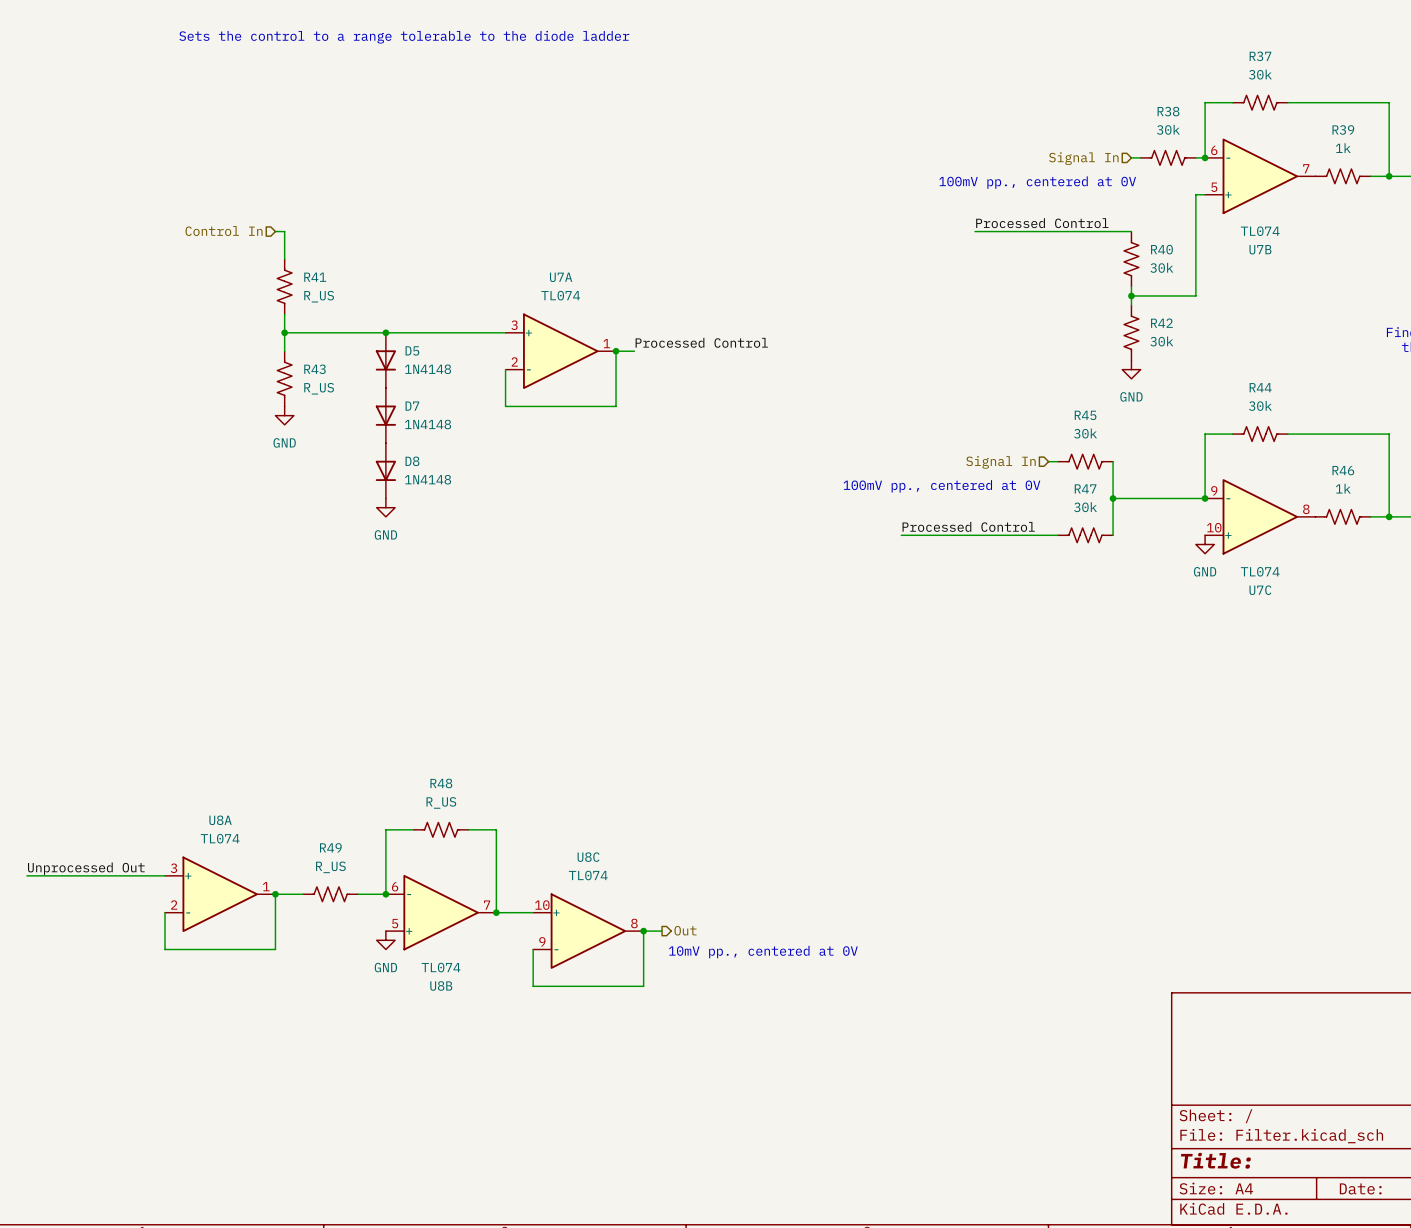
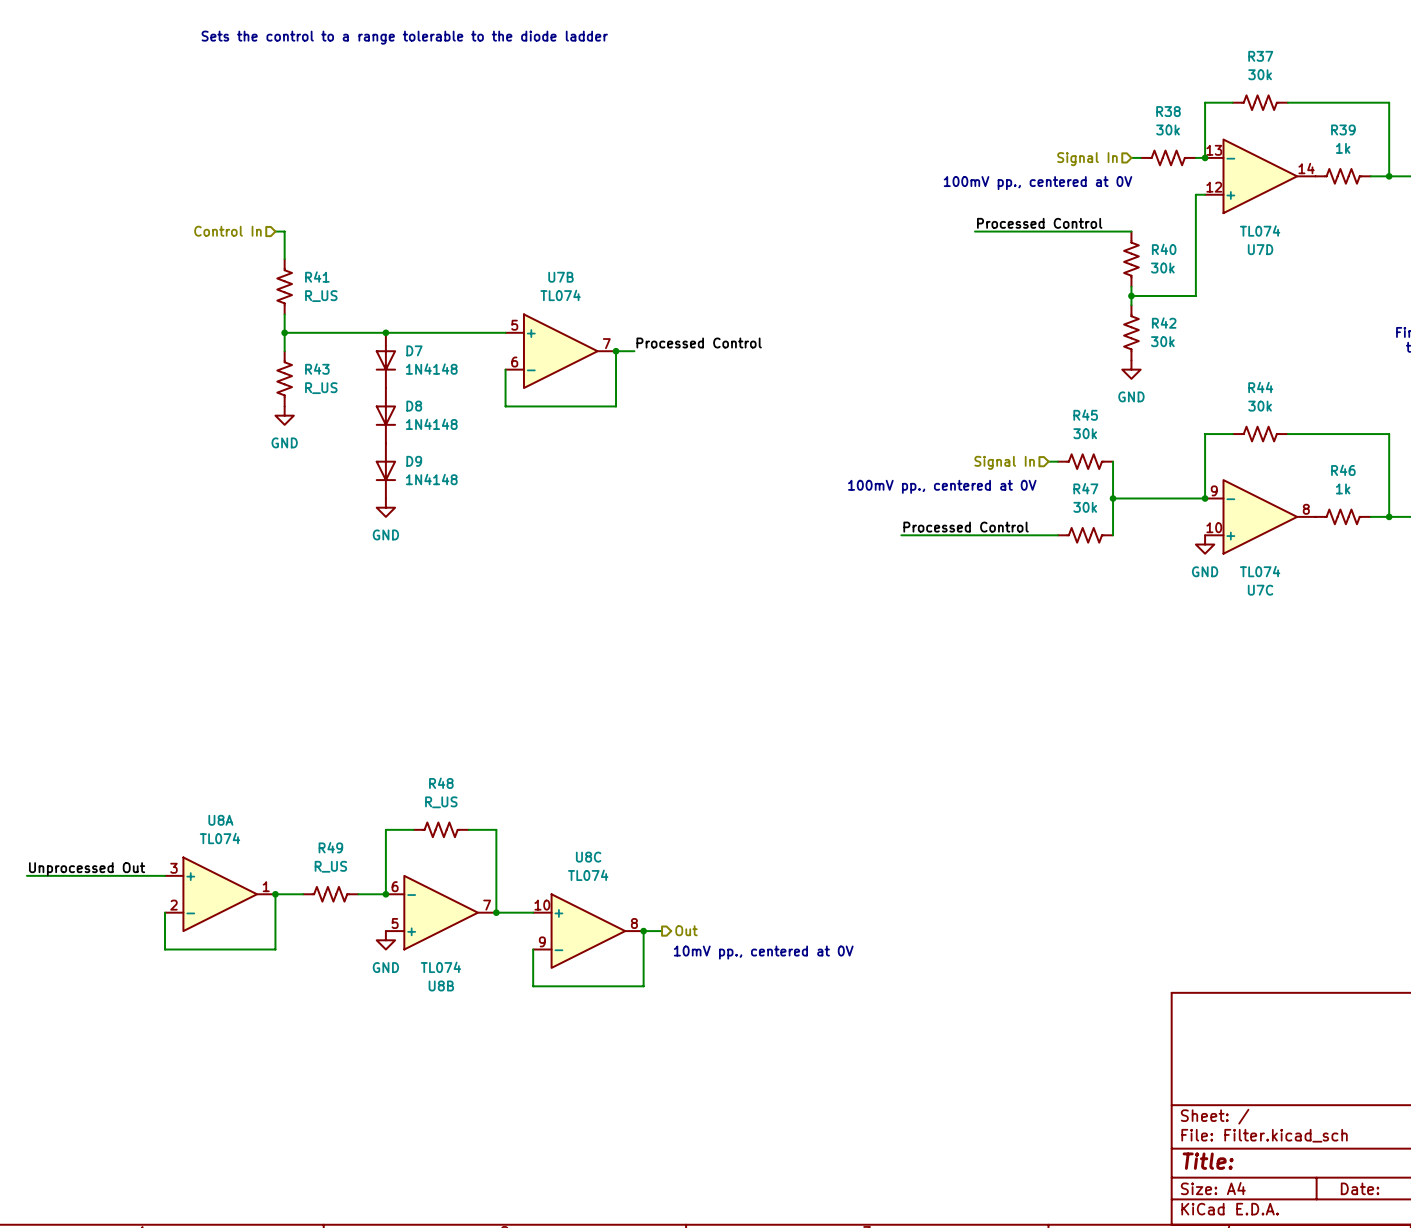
U7B flip: as is (1260, 176) -> up-down (560, 351)
U7B position: (1260, 176) -> (560, 351)
U7D: none -> TL074 (1260, 176)
D5 name: D5 (412, 350) -> D7 (414, 350)
U7A: TL074 (560, 351) -> none
D7 name: D7 (412, 406) -> D8 (414, 406)
D8 name: D8 (412, 461) -> D9 (414, 461)

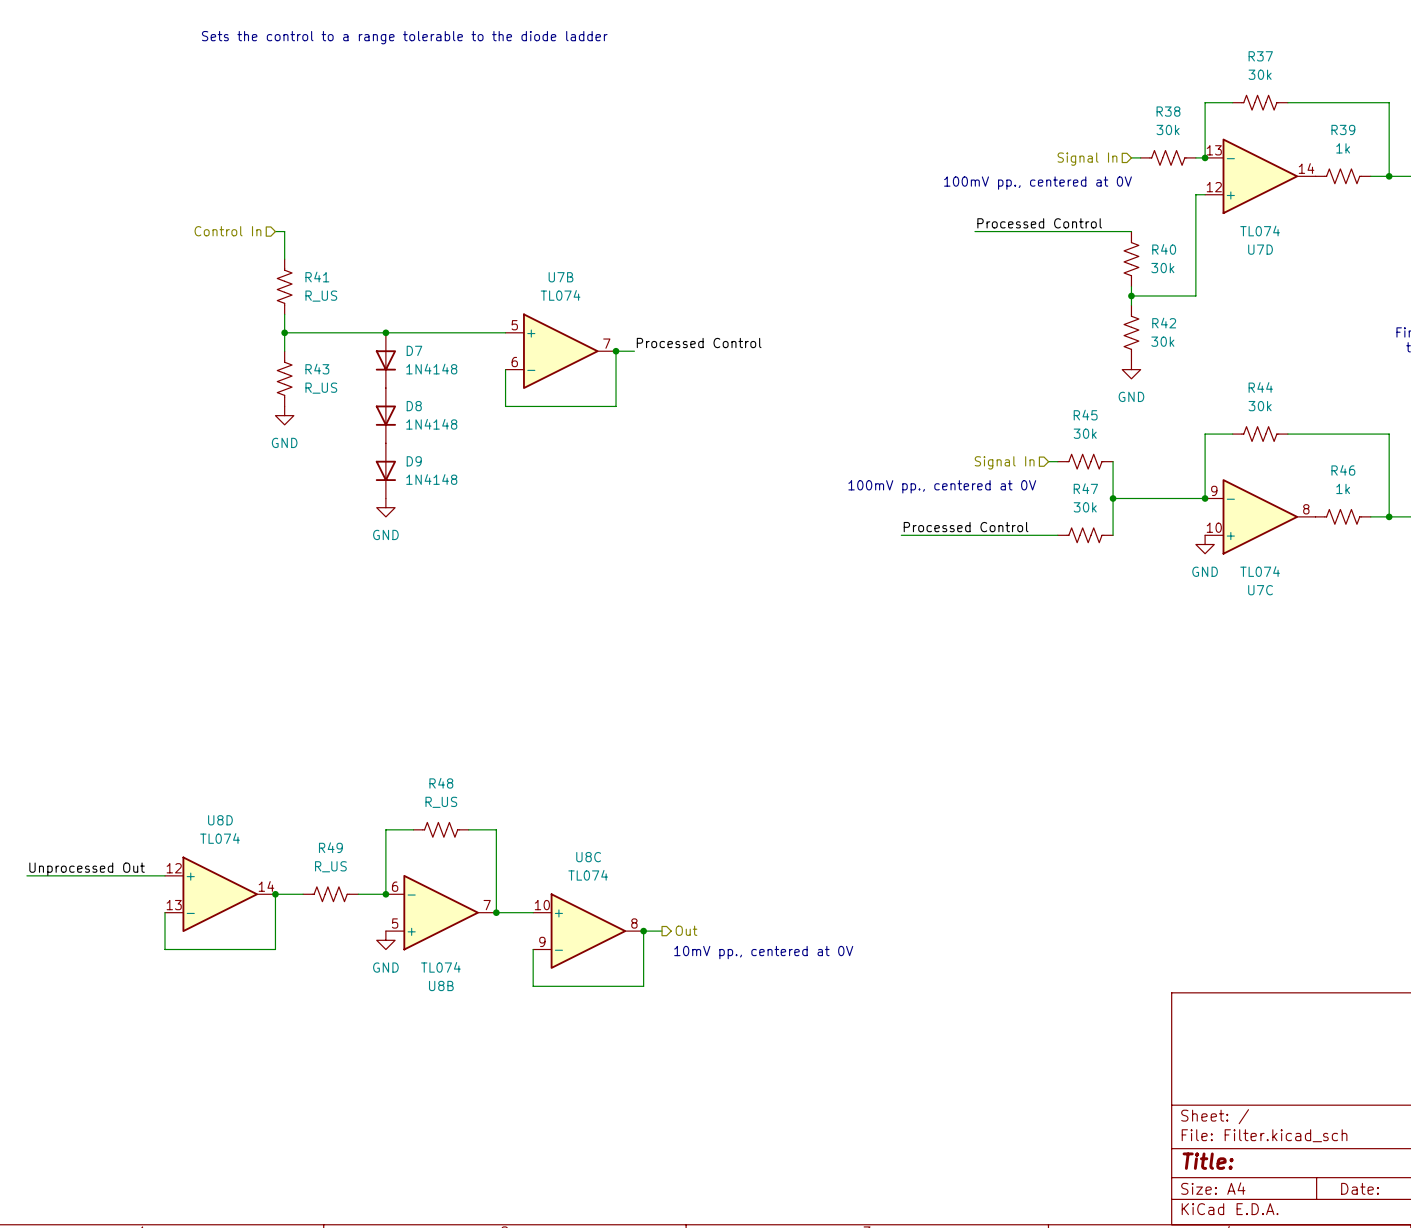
U8A name: U8A (220, 820) -> U8D (220, 820)
U8A pin number: 3 (173, 868) -> 12 (174, 868)
U8A pin number: 1 (266, 886) -> 14 (266, 886)
U8A pin number: 2 (173, 905) -> 13 (174, 905)

